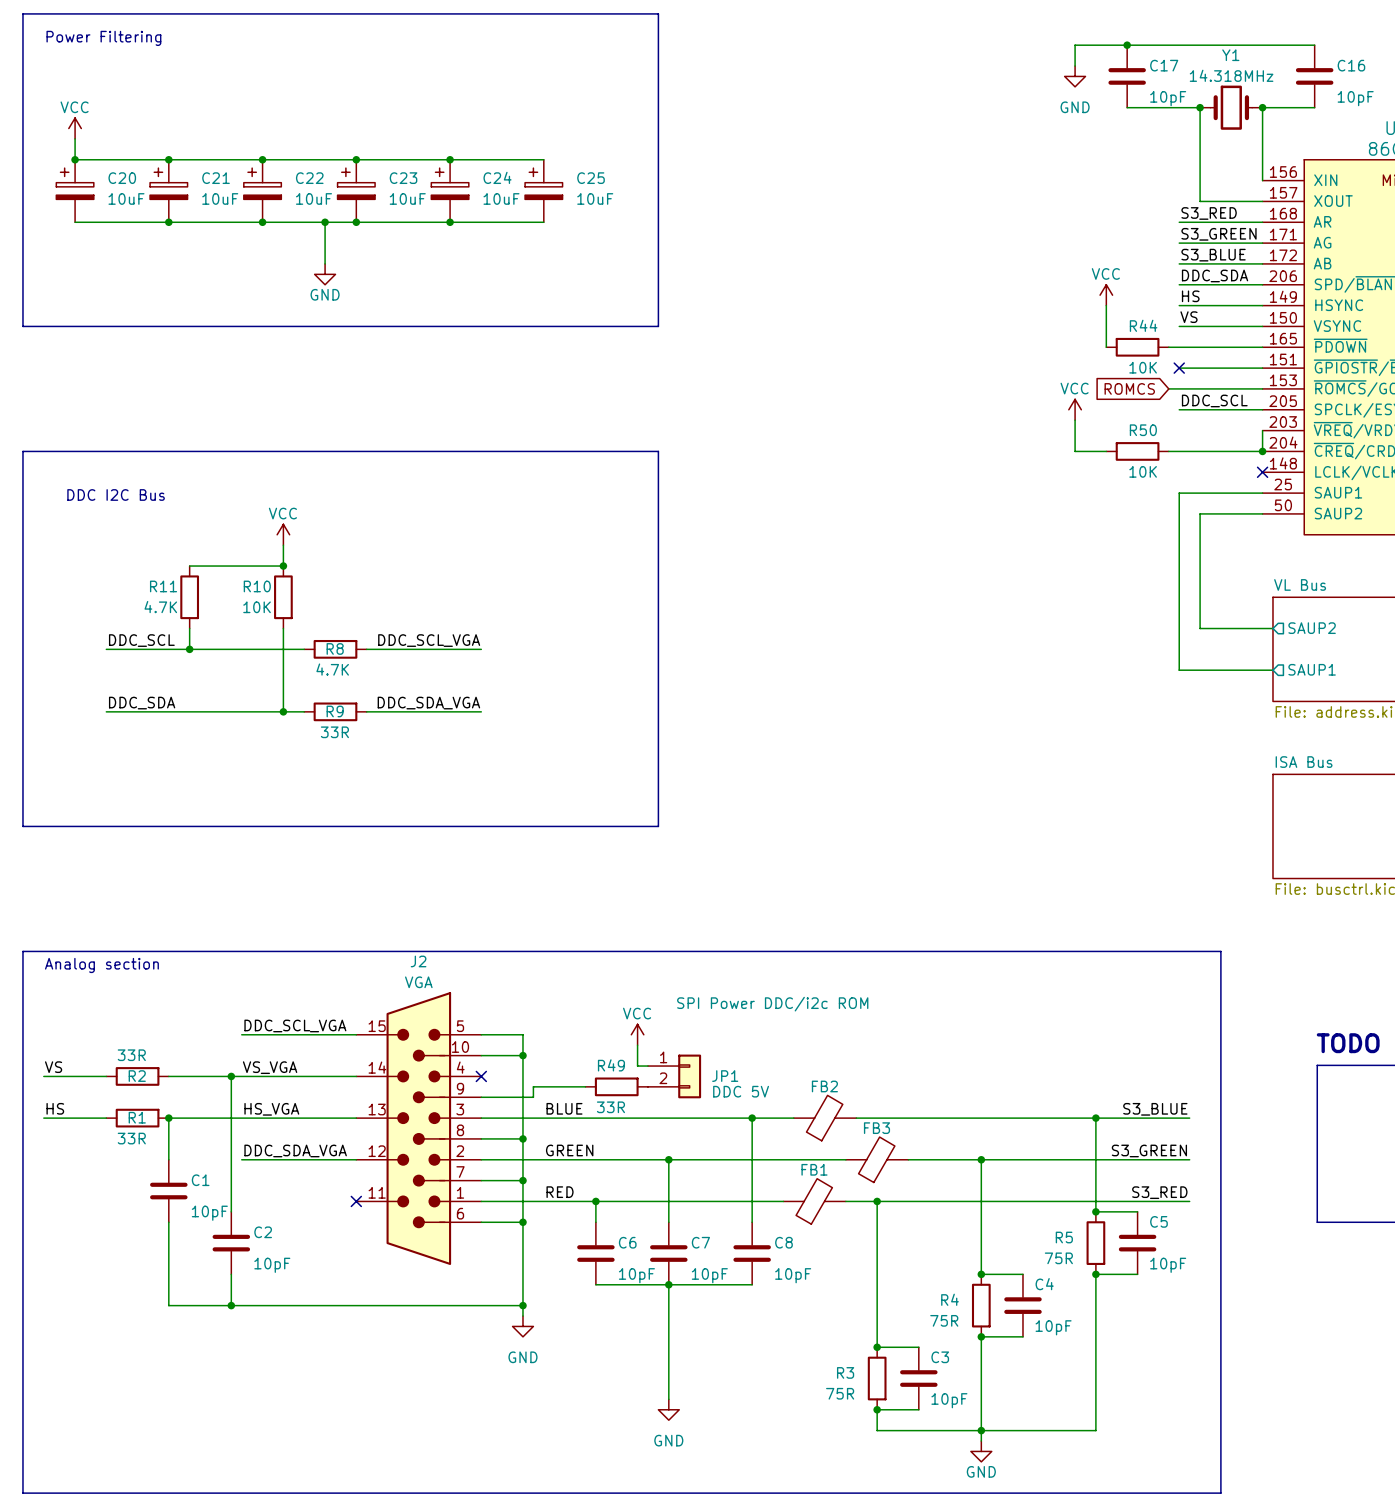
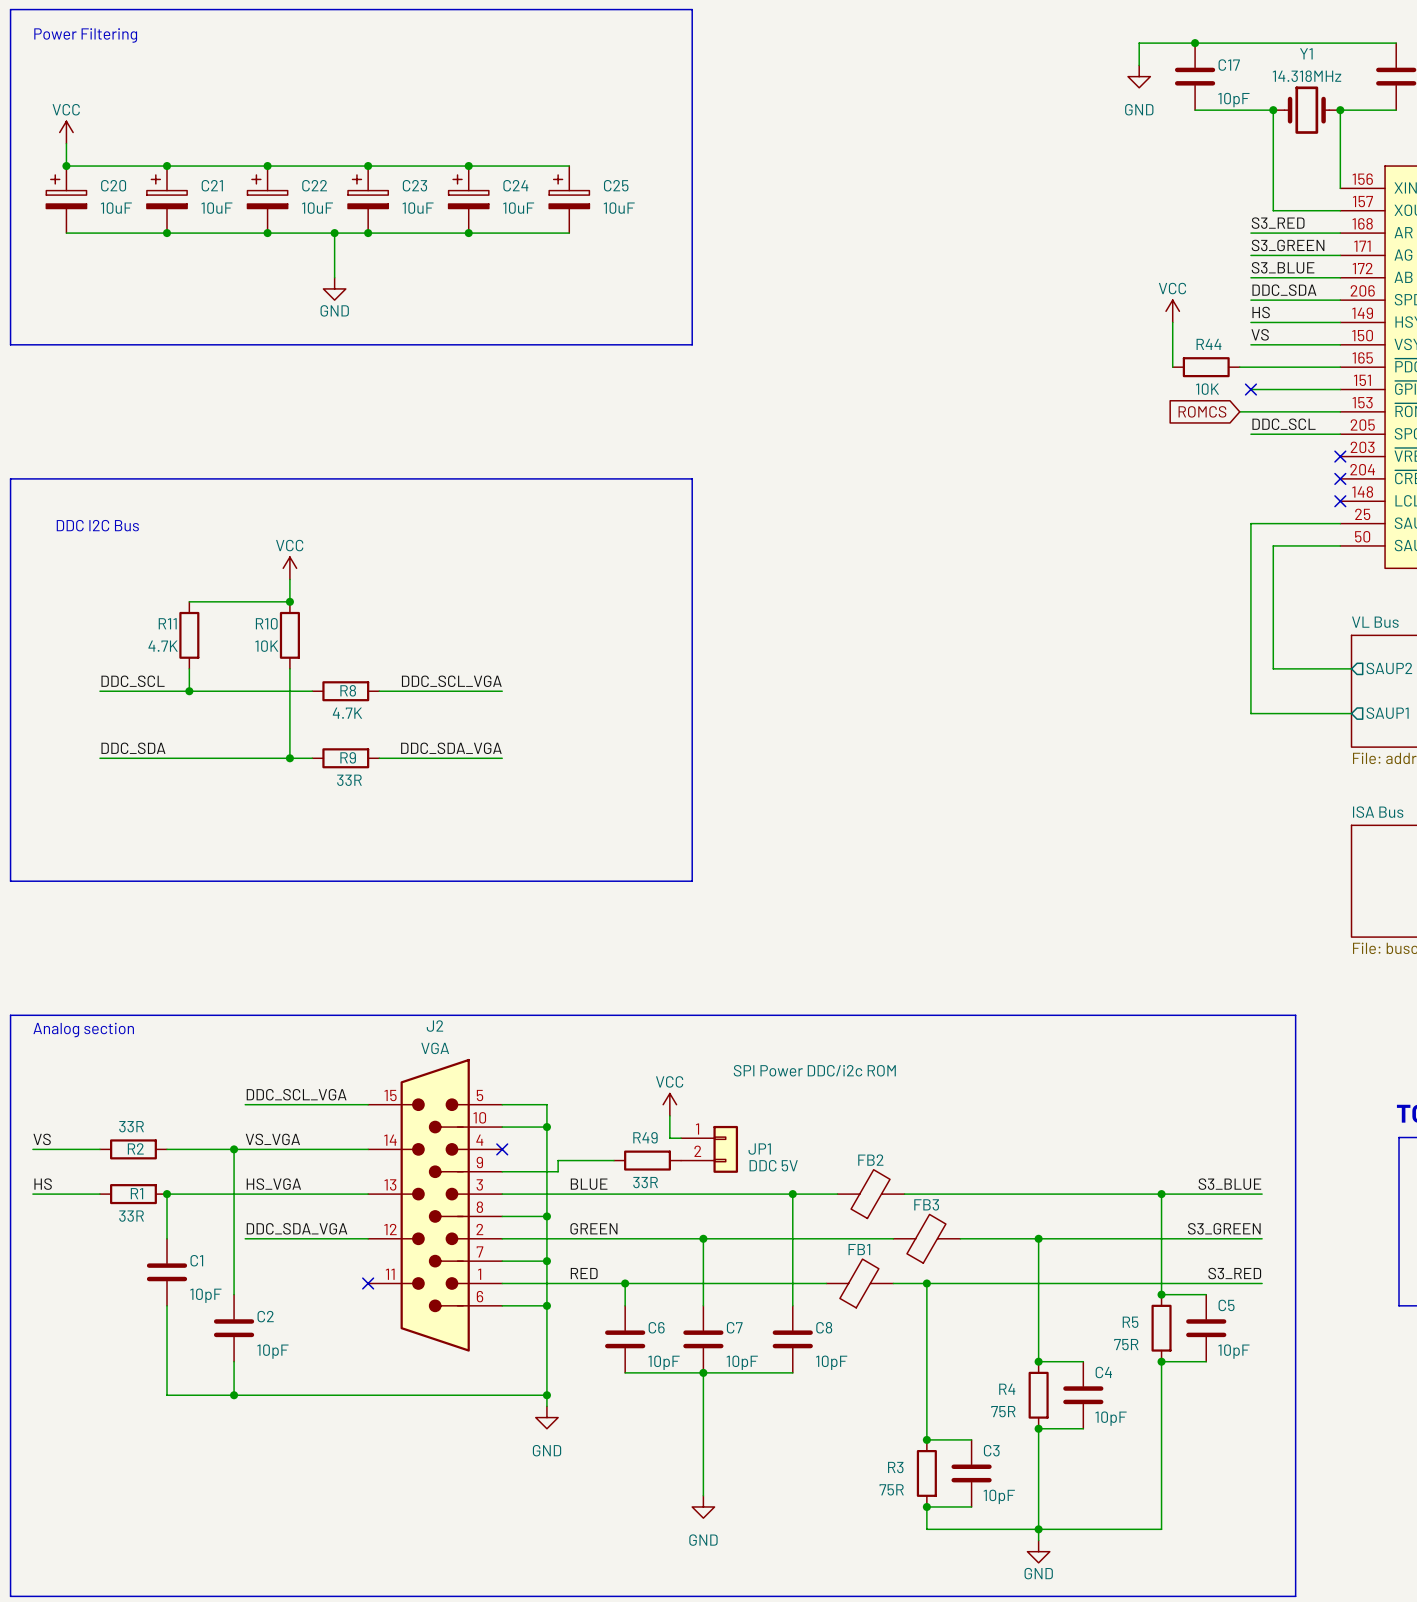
power symbol: VCC (1075, 409) -> none
wire: (1075, 420) (1075, 451) (1106, 451) -> none
wire: (1262, 430) (1262, 451) (1168, 451) -> none
no-connect mark: none -> (1340, 456)
R50: 10K (1137, 451) -> none
junction: (1262, 451) -> none
no-connect mark: none -> (1340, 478)

